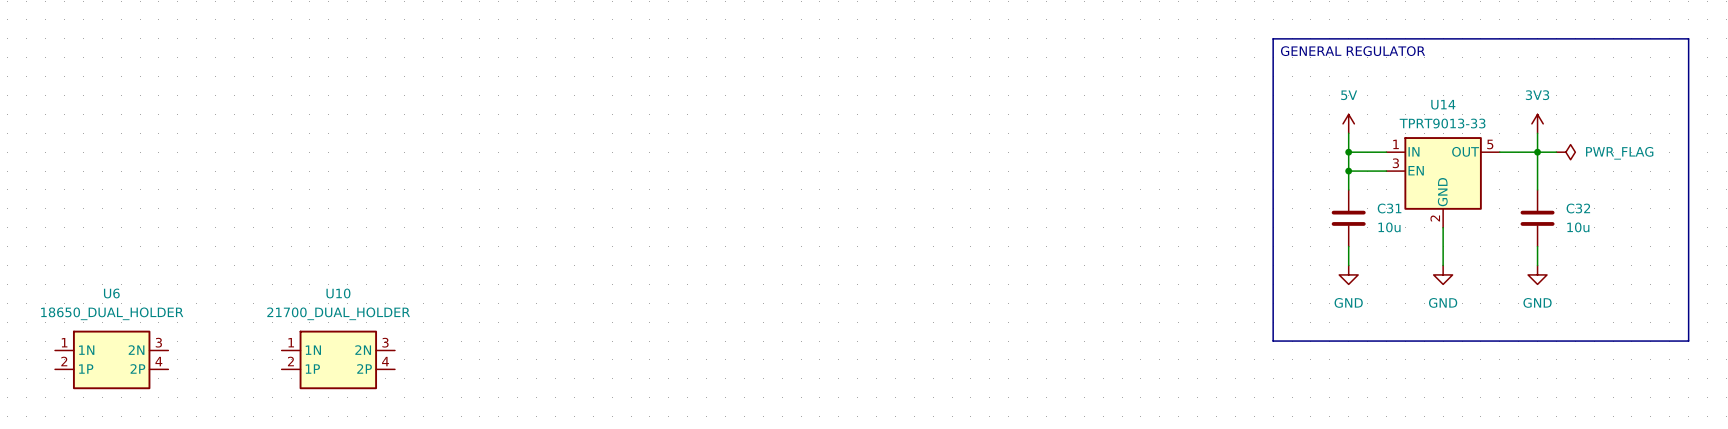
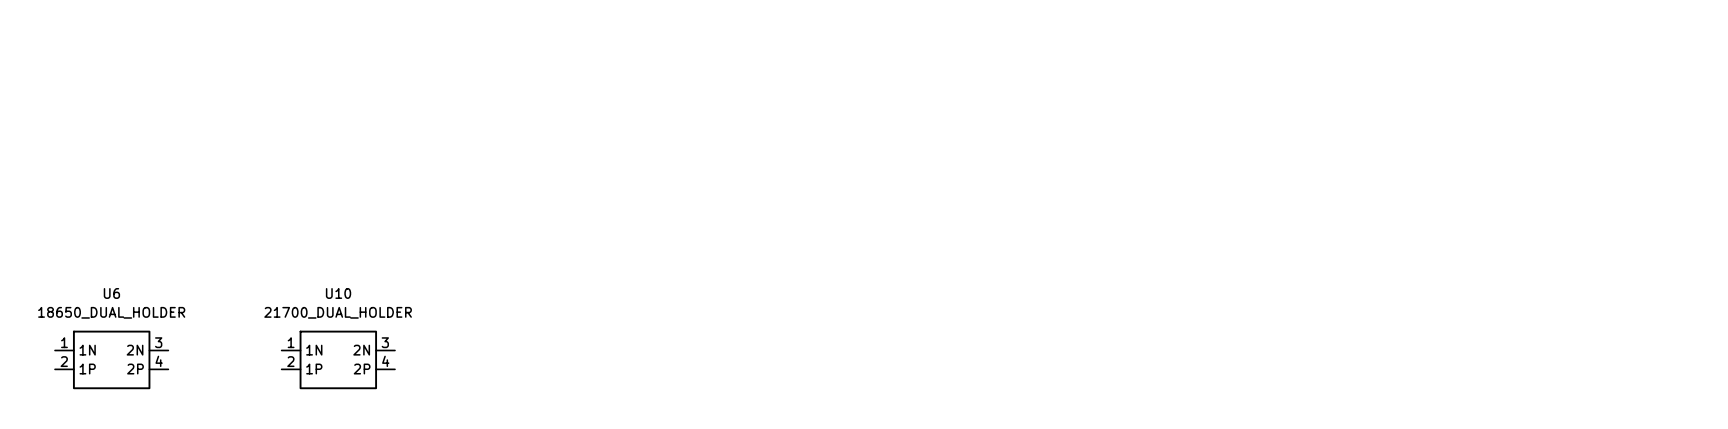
line: (1273, 38) (1688, 38) (1688, 341) (1273, 341) (1273, 38) -> none
text: GENERAL REGULATOR (1352, 51) -> none
power symbol: 5V (1348, 123) -> none
power symbol: 3V3 (1537, 123) -> none
wire: (1348, 133) (1348, 189) -> none
wire: (1537, 133) (1537, 189) -> none
wire: (1348, 152) (1386, 152) -> none
junction: (1348, 152) -> none
wire: (1499, 152) (1556, 152) -> none
junction: (1537, 152) -> none
power symbol: PWR_FLAG (1565, 152) -> none
wire: (1348, 171) (1386, 171) -> none
junction: (1348, 171) -> none
U14: TPRT9013-33 (1443, 182) -> none
C31: 10u (1348, 218) -> none
C32: 10u (1537, 218) -> none
wire: (1443, 227) (1443, 265) -> none
wire: (1348, 246) (1348, 265) -> none
wire: (1537, 246) (1537, 265) -> none
power symbol: GND (1348, 274) -> none
power symbol: GND (1443, 274) -> none
power symbol: GND (1537, 274) -> none

